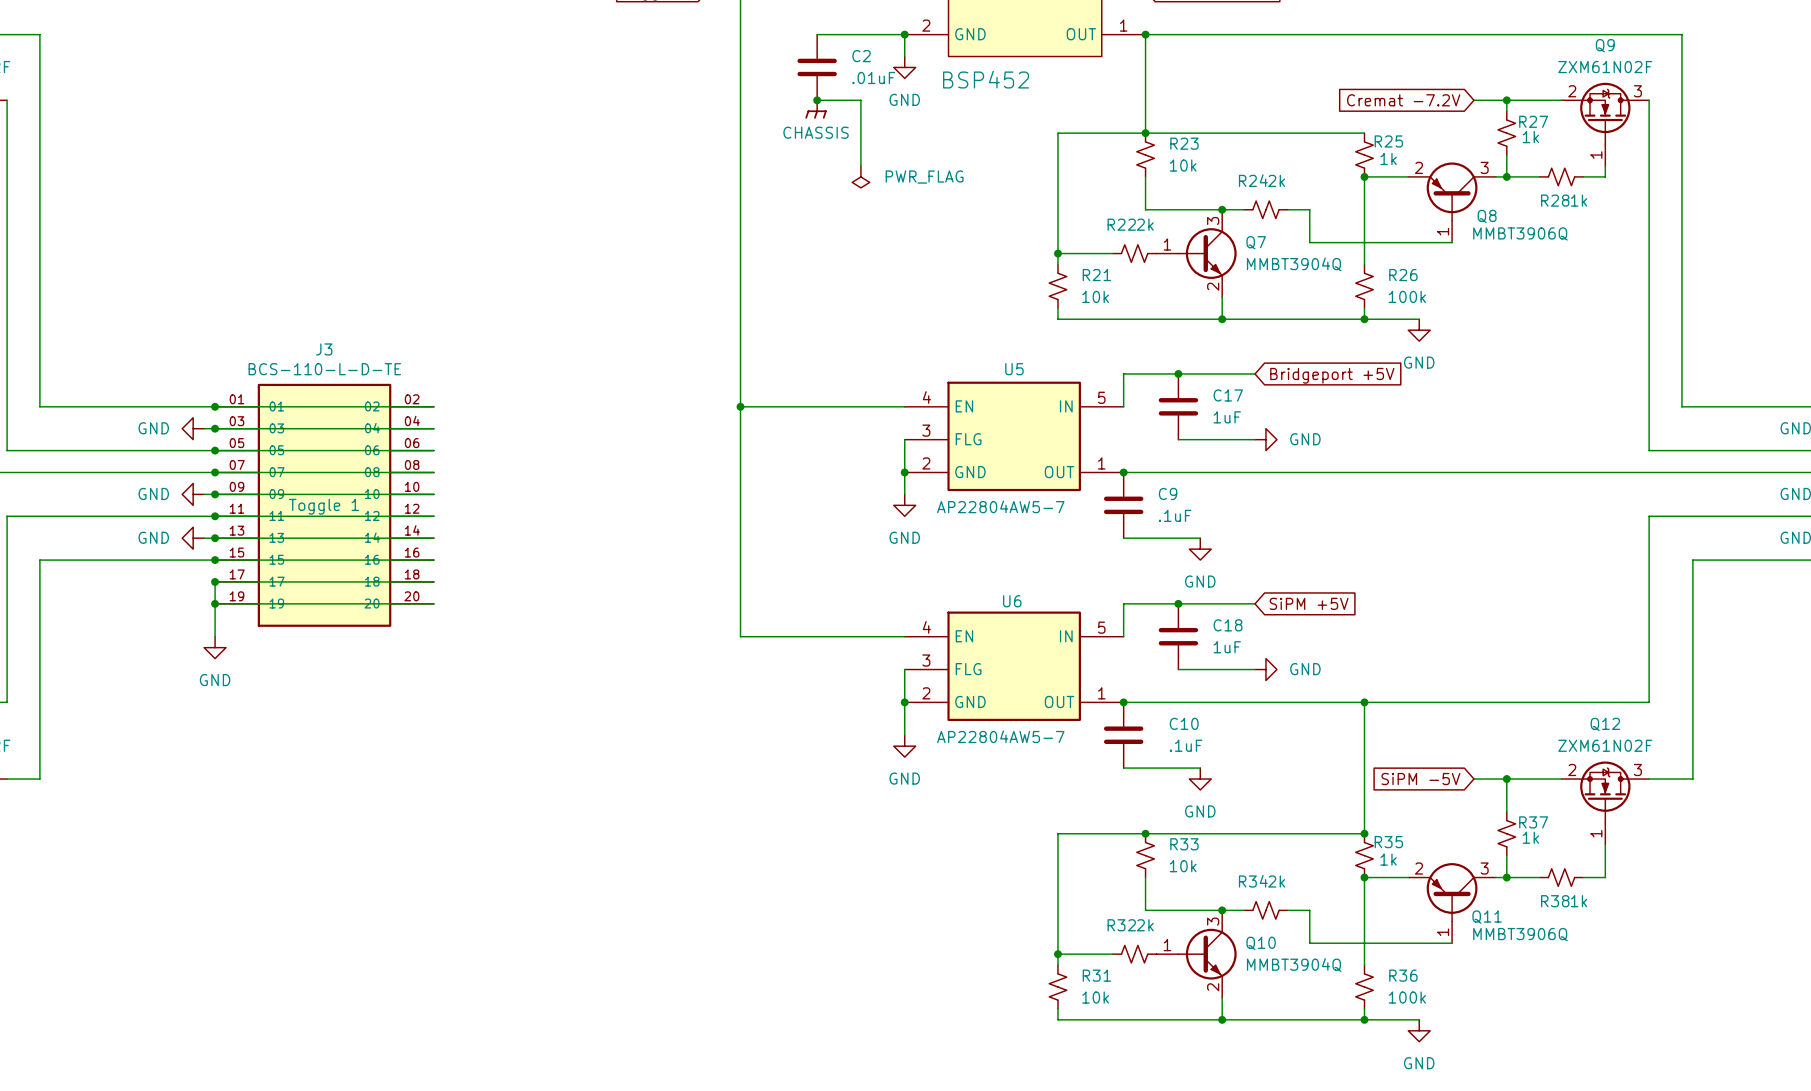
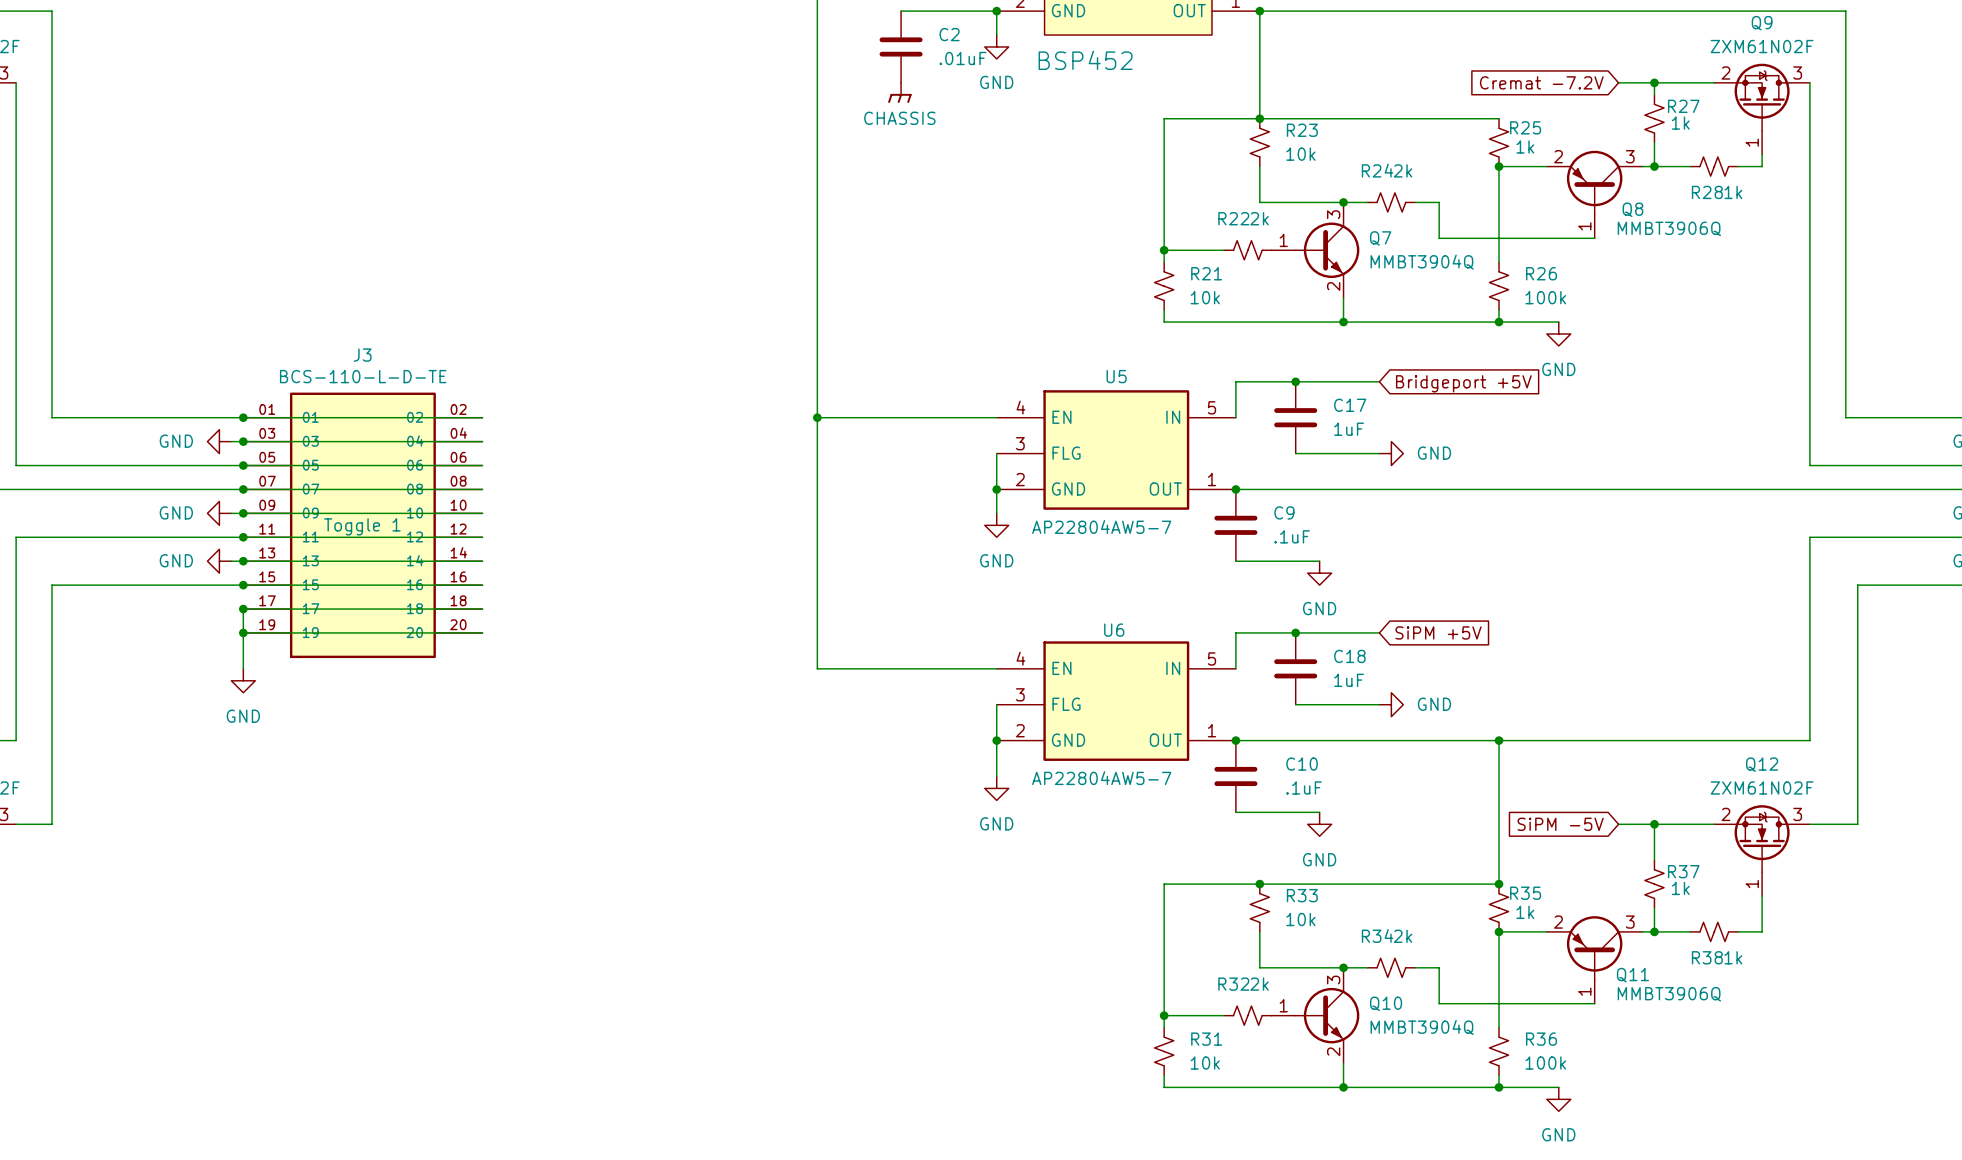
wire: (817, 100) (860, 100) (860, 165) -> none
junction: (817, 100) -> none
power symbol: PWR_FLAG (860, 176) -> none

